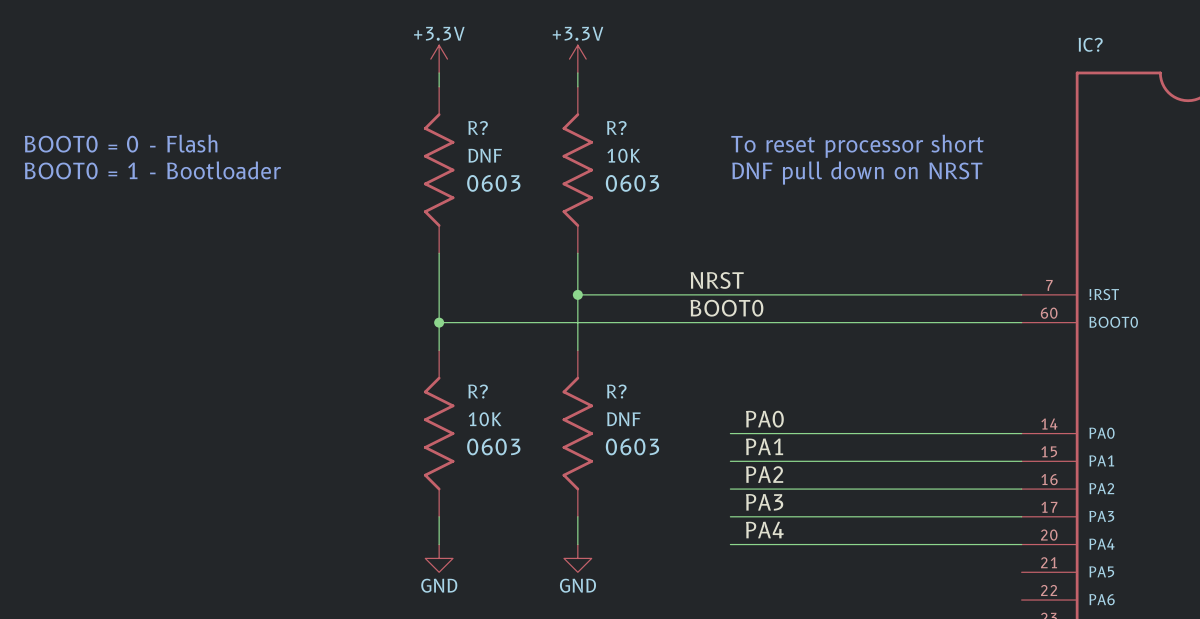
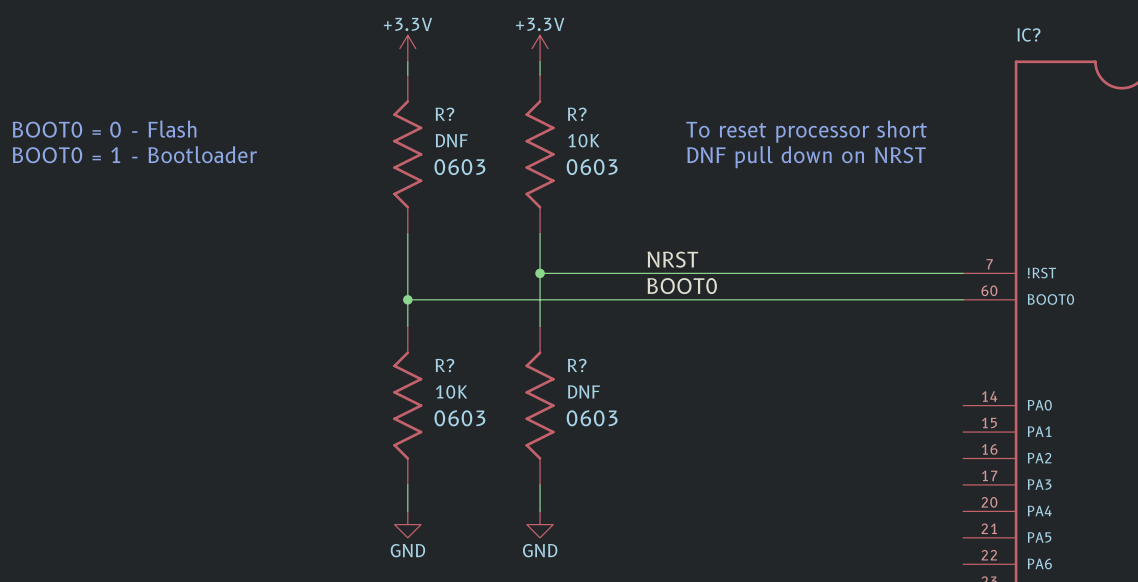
label: PA0 (764, 419) -> none
wire: (730, 433) (1021, 433) -> none
label: PA1 (764, 446) -> none
wire: (730, 461) (1021, 461) -> none
label: PA2 (764, 474) -> none
wire: (730, 489) (1021, 489) -> none
label: PA3 (764, 502) -> none
wire: (730, 516) (1021, 516) -> none
label: PA4 (764, 530) -> none
wire: (730, 544) (1021, 544) -> none

